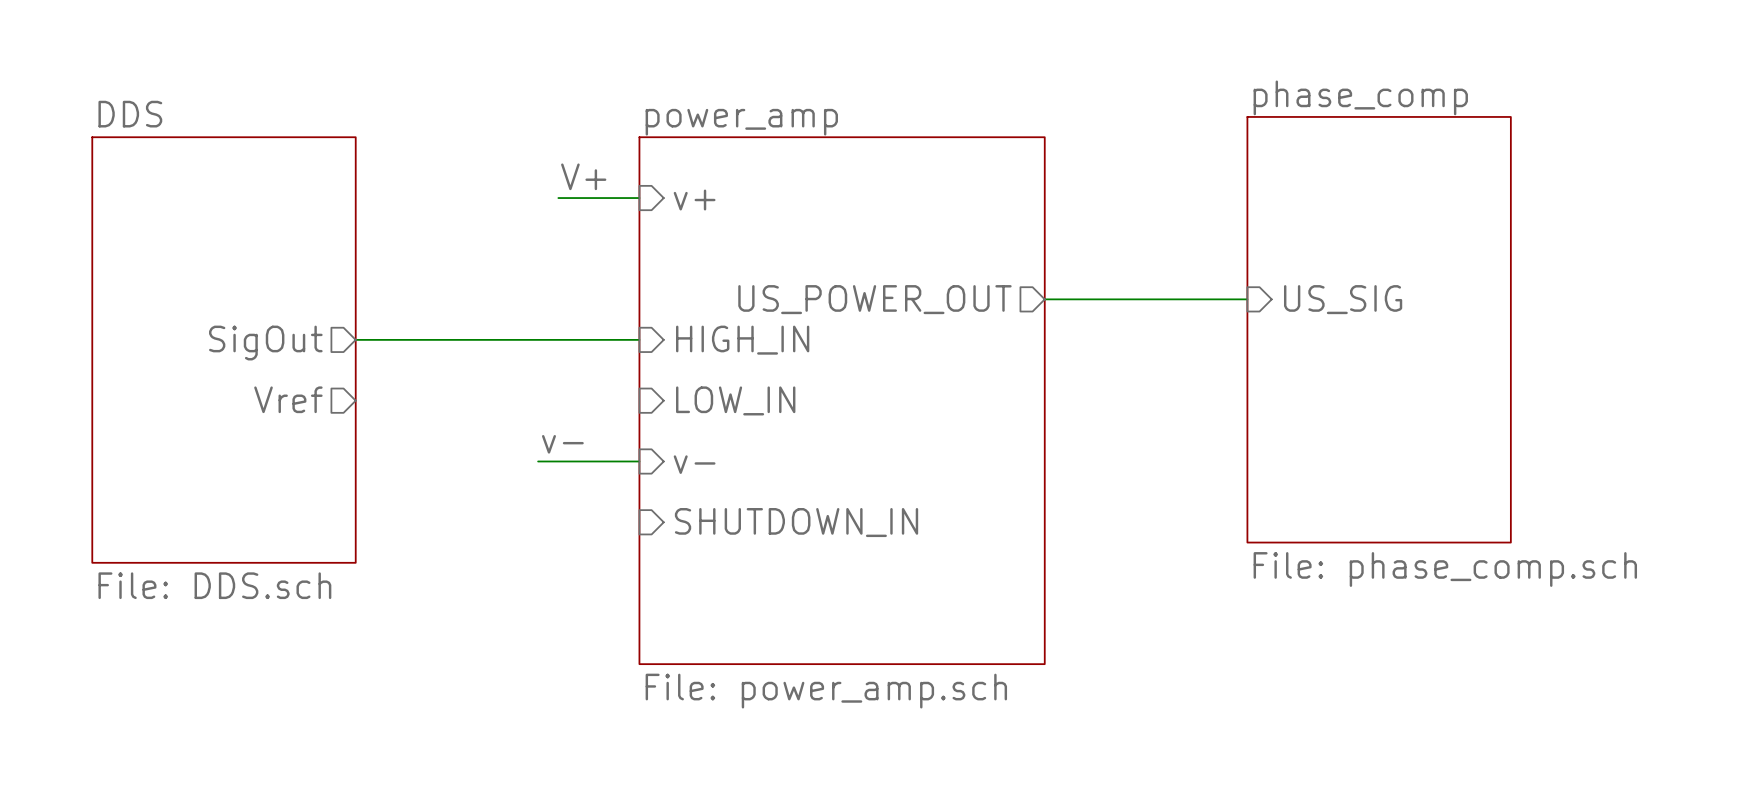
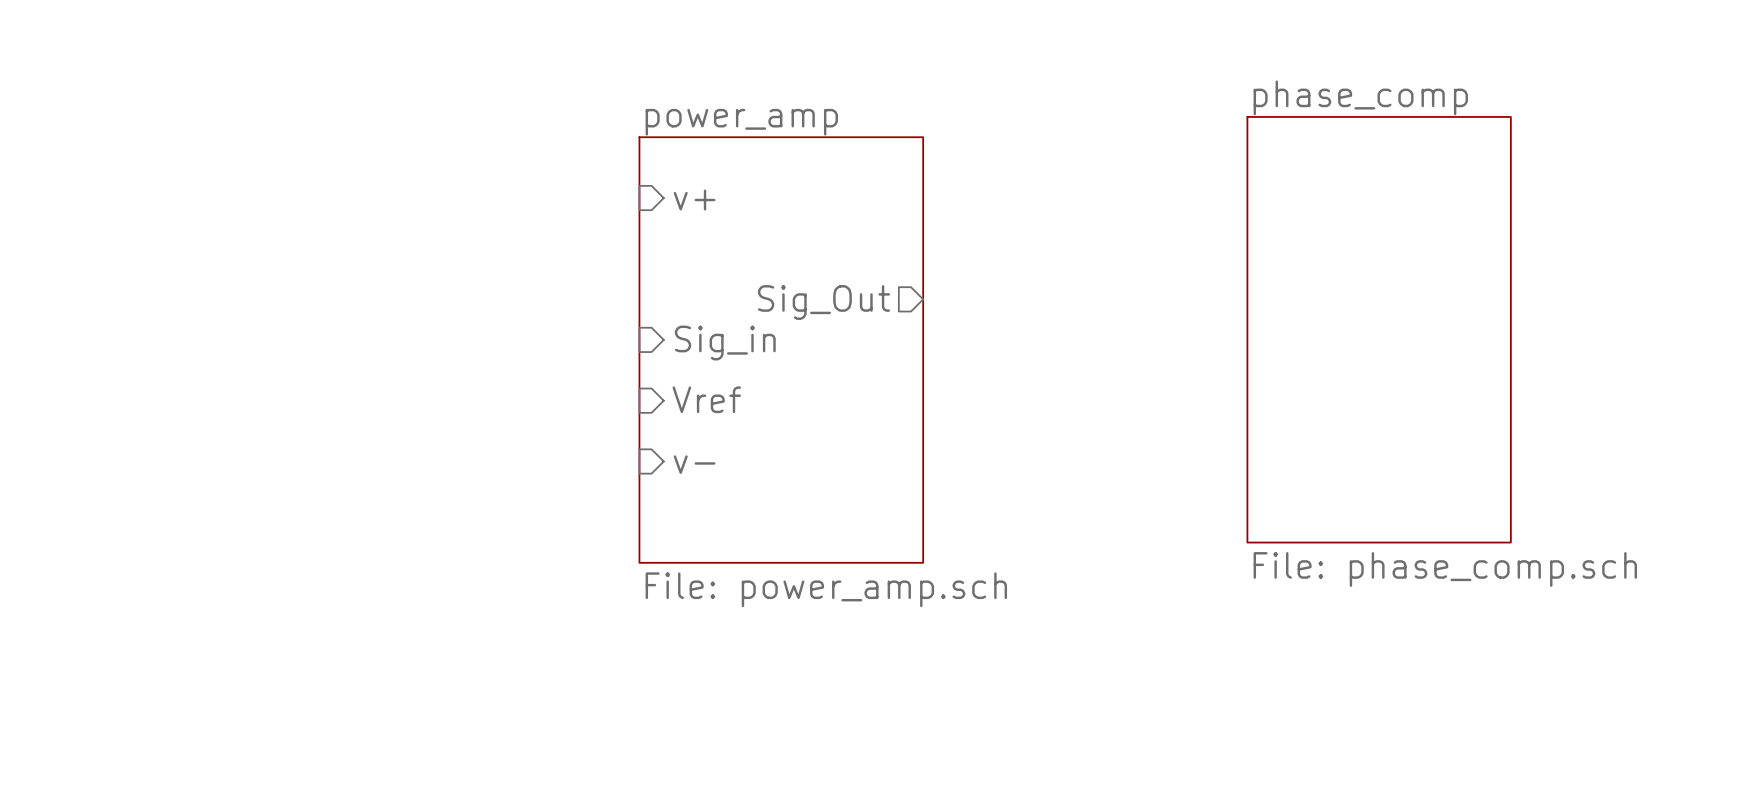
label: V+ (583, 176) -> none
wire: (558, 198) (639, 198) -> none
sheet pin: US_POWER_OUT (874, 299) -> none
wire: (1044, 299) (1247, 299) -> none
sheet pin: US_SIG (1343, 299) -> none
sheet pin: none -> Sig_Out (824, 302)
wire: (355, 339) (639, 339) -> none
sheet pin: HIGH_IN (742, 340) -> Sig_in (725, 343)
sheet pin: SigOut (265, 343) -> none
sheet DDS: File: DDS.sch (224, 350) -> none
sheet power_amp: none -> File: power_amp.sch (781, 350)
sheet pin: Vref (288, 399) -> none
sheet pin: LOW_IN (735, 400) -> Vref (706, 399)
sheet power_amp: File: power_amp.sch (842, 400) -> none
label: v- (562, 444) -> none
wire: (538, 461) (639, 461) -> none
sheet pin: SHUTDOWN_IN (796, 522) -> none

